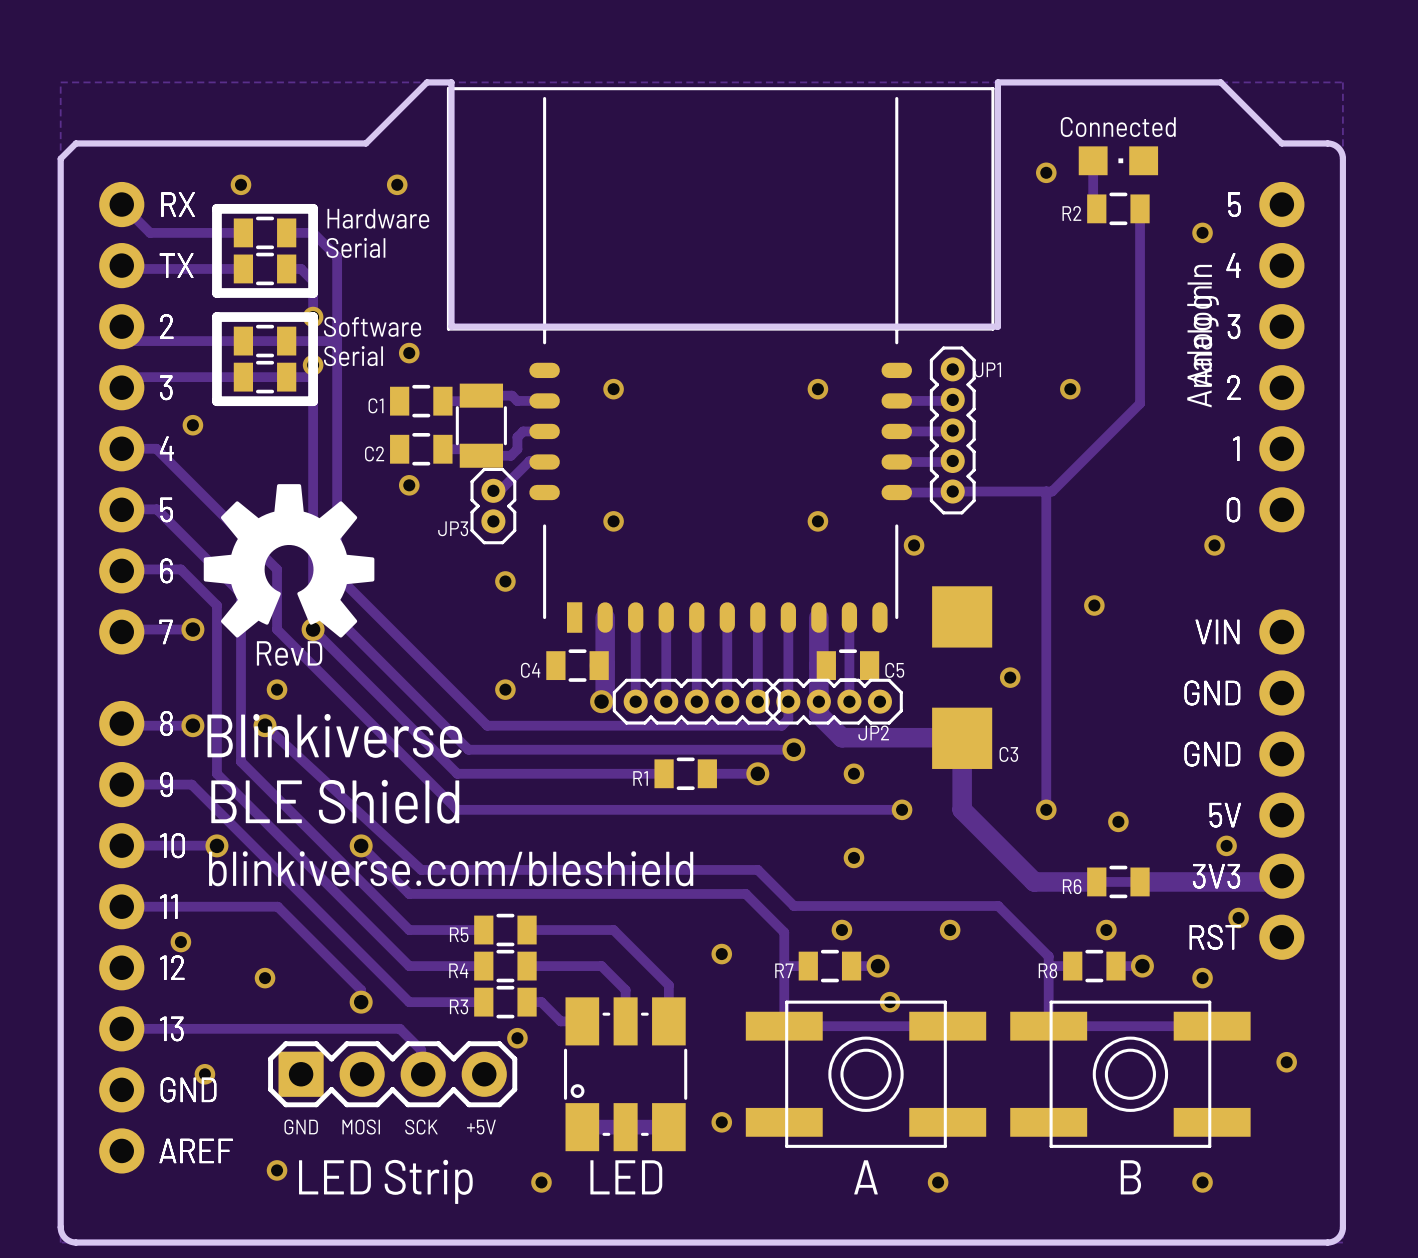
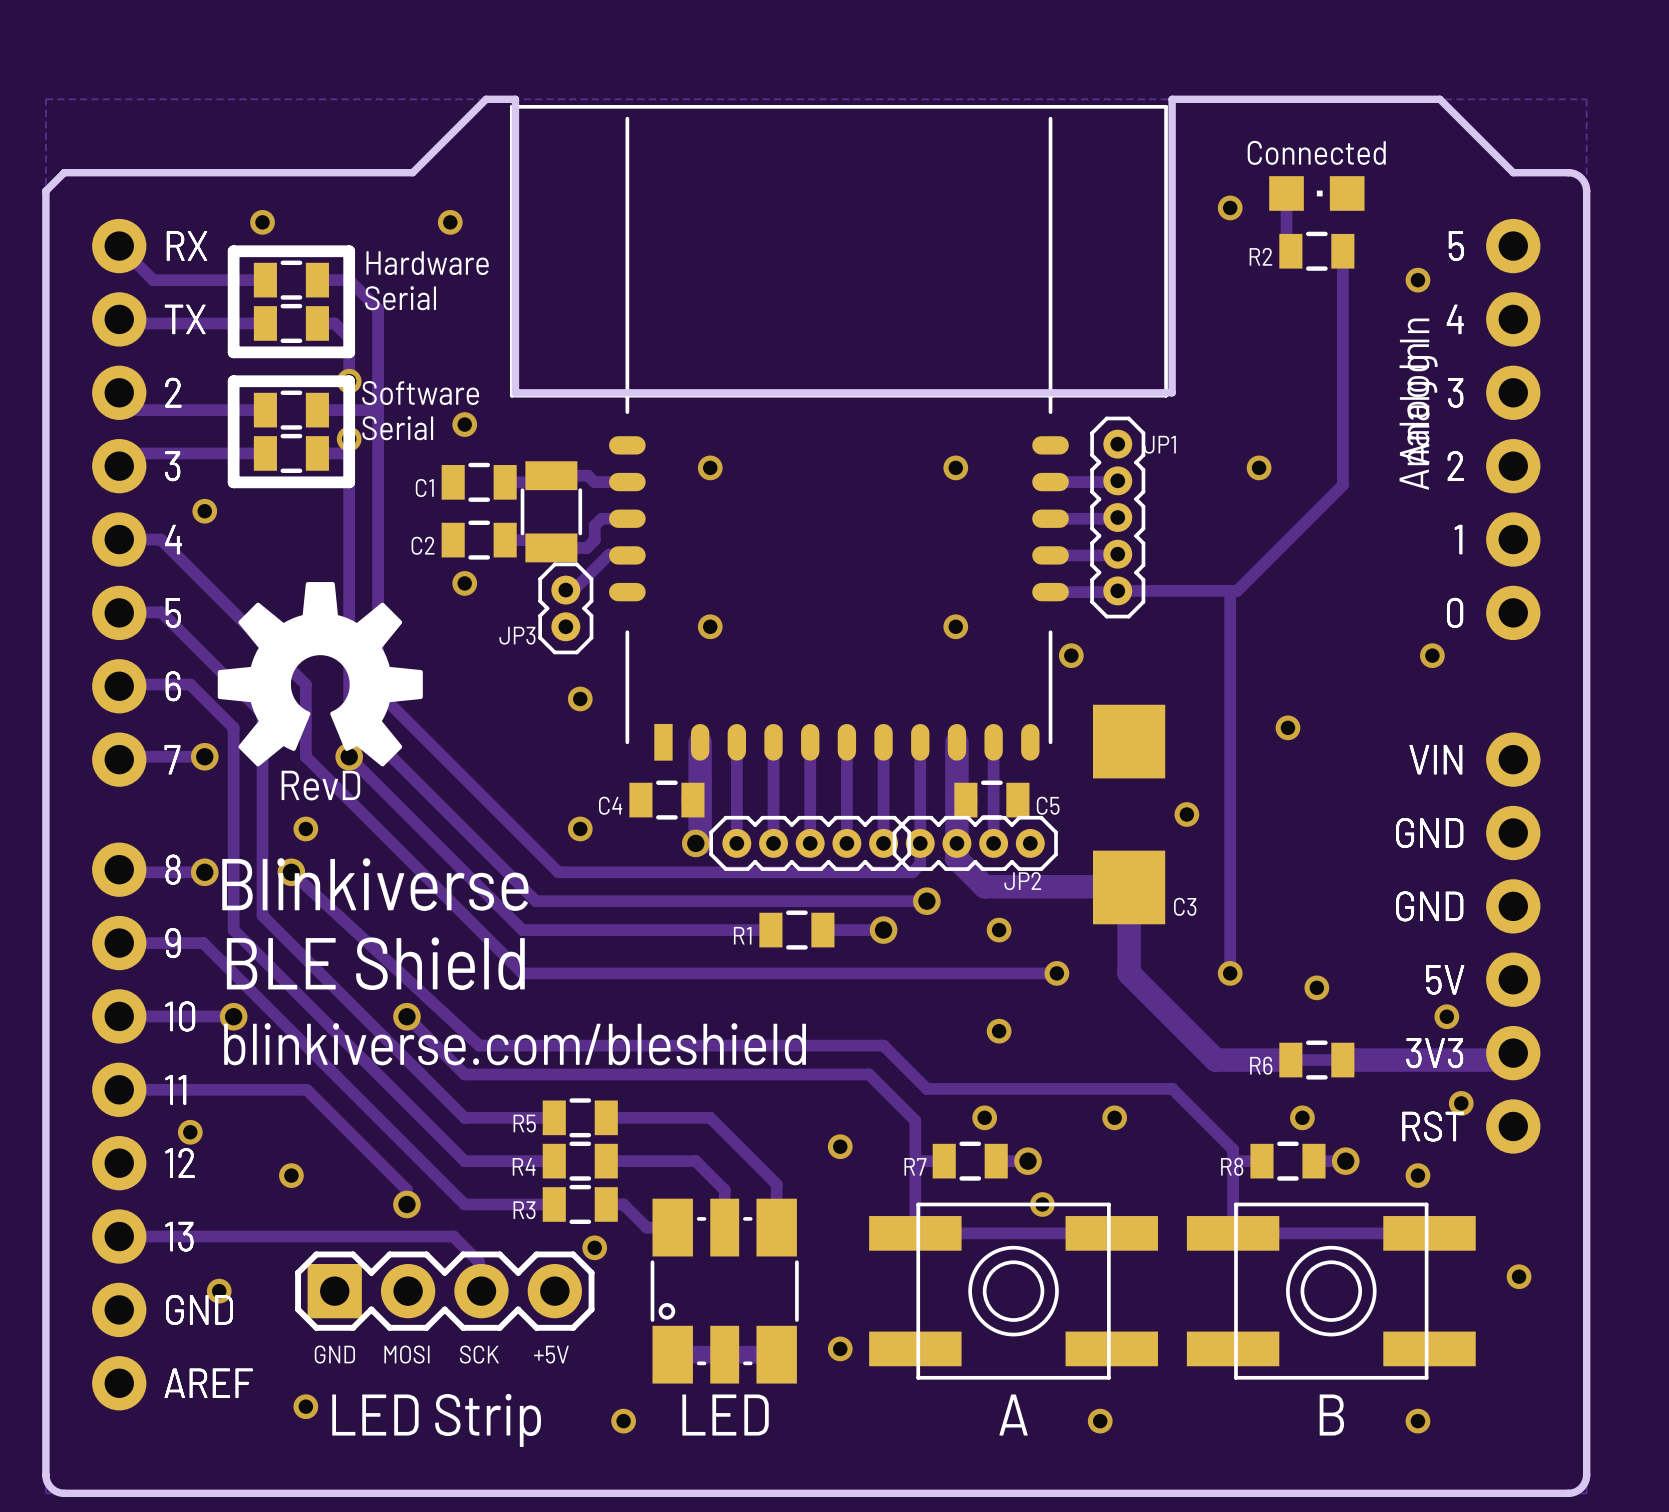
track: (243, 341) (286, 341) -> none
track: (243, 377) (286, 377) -> none

